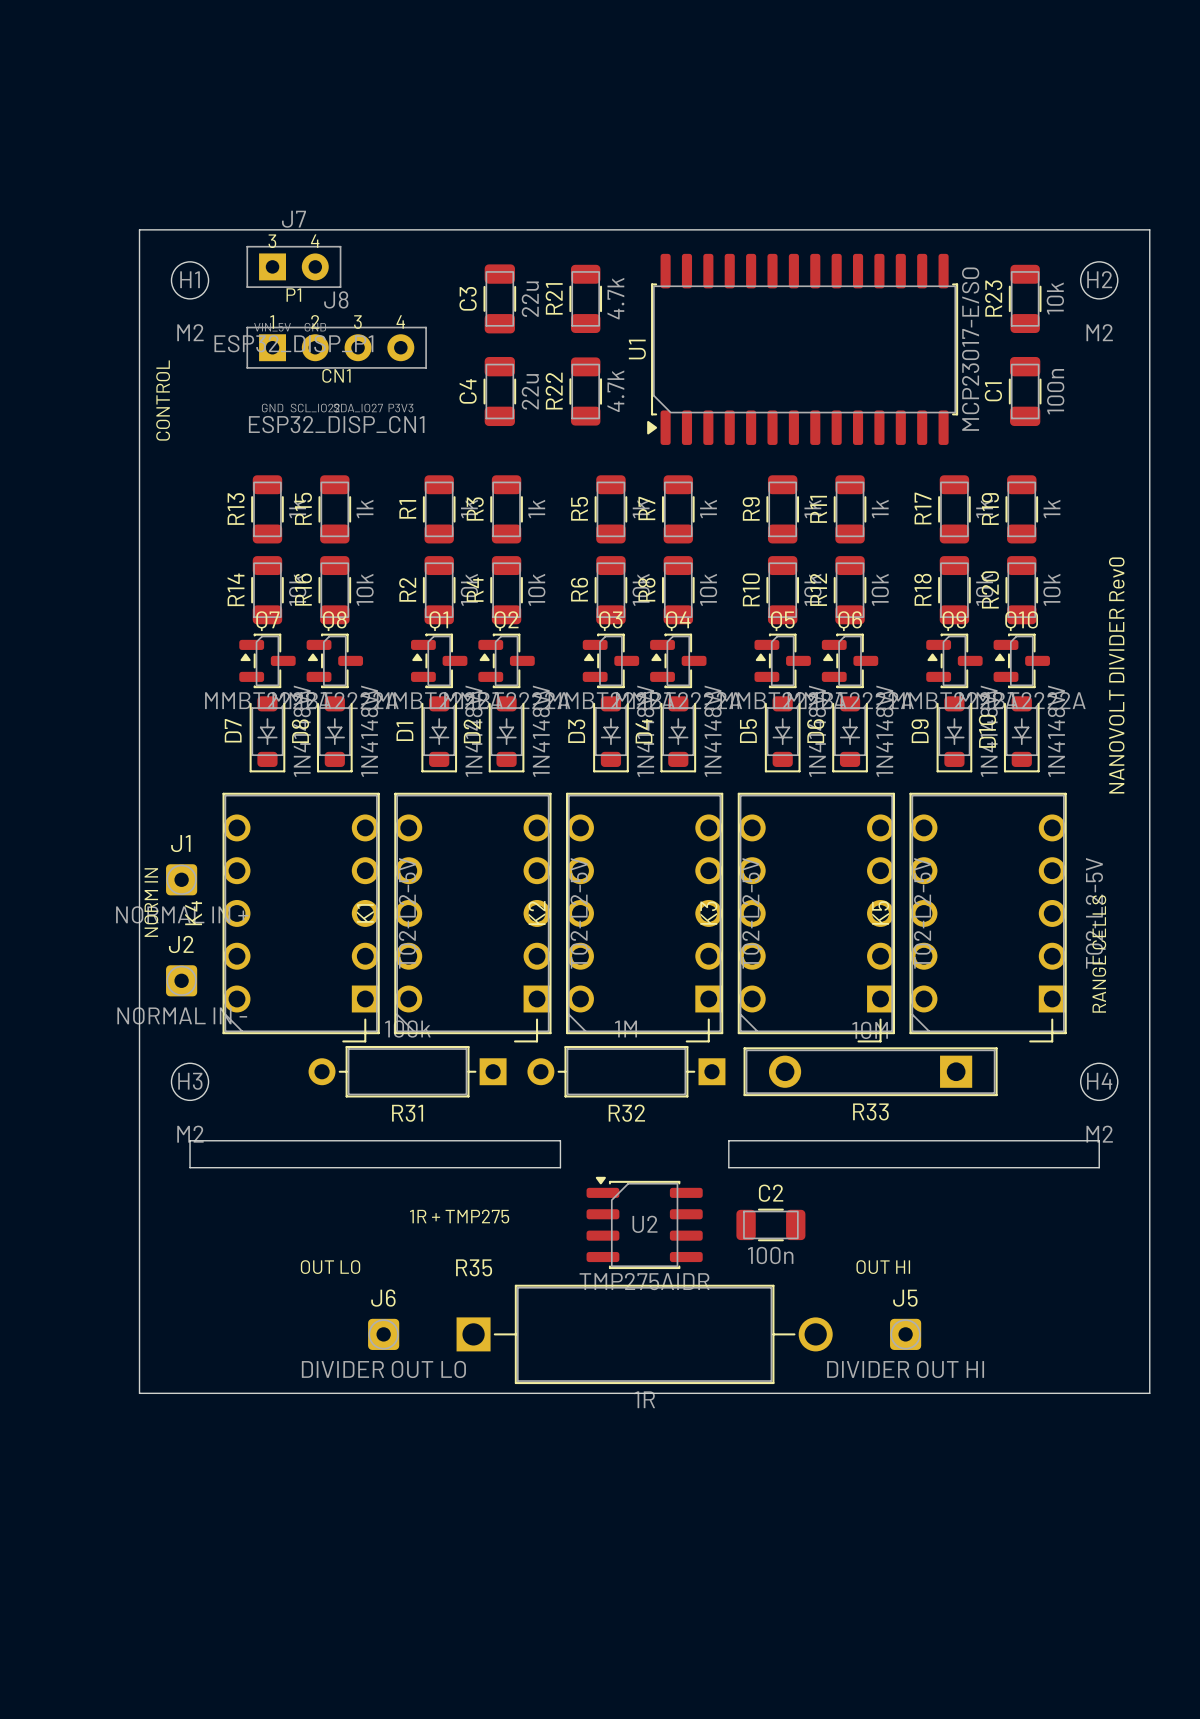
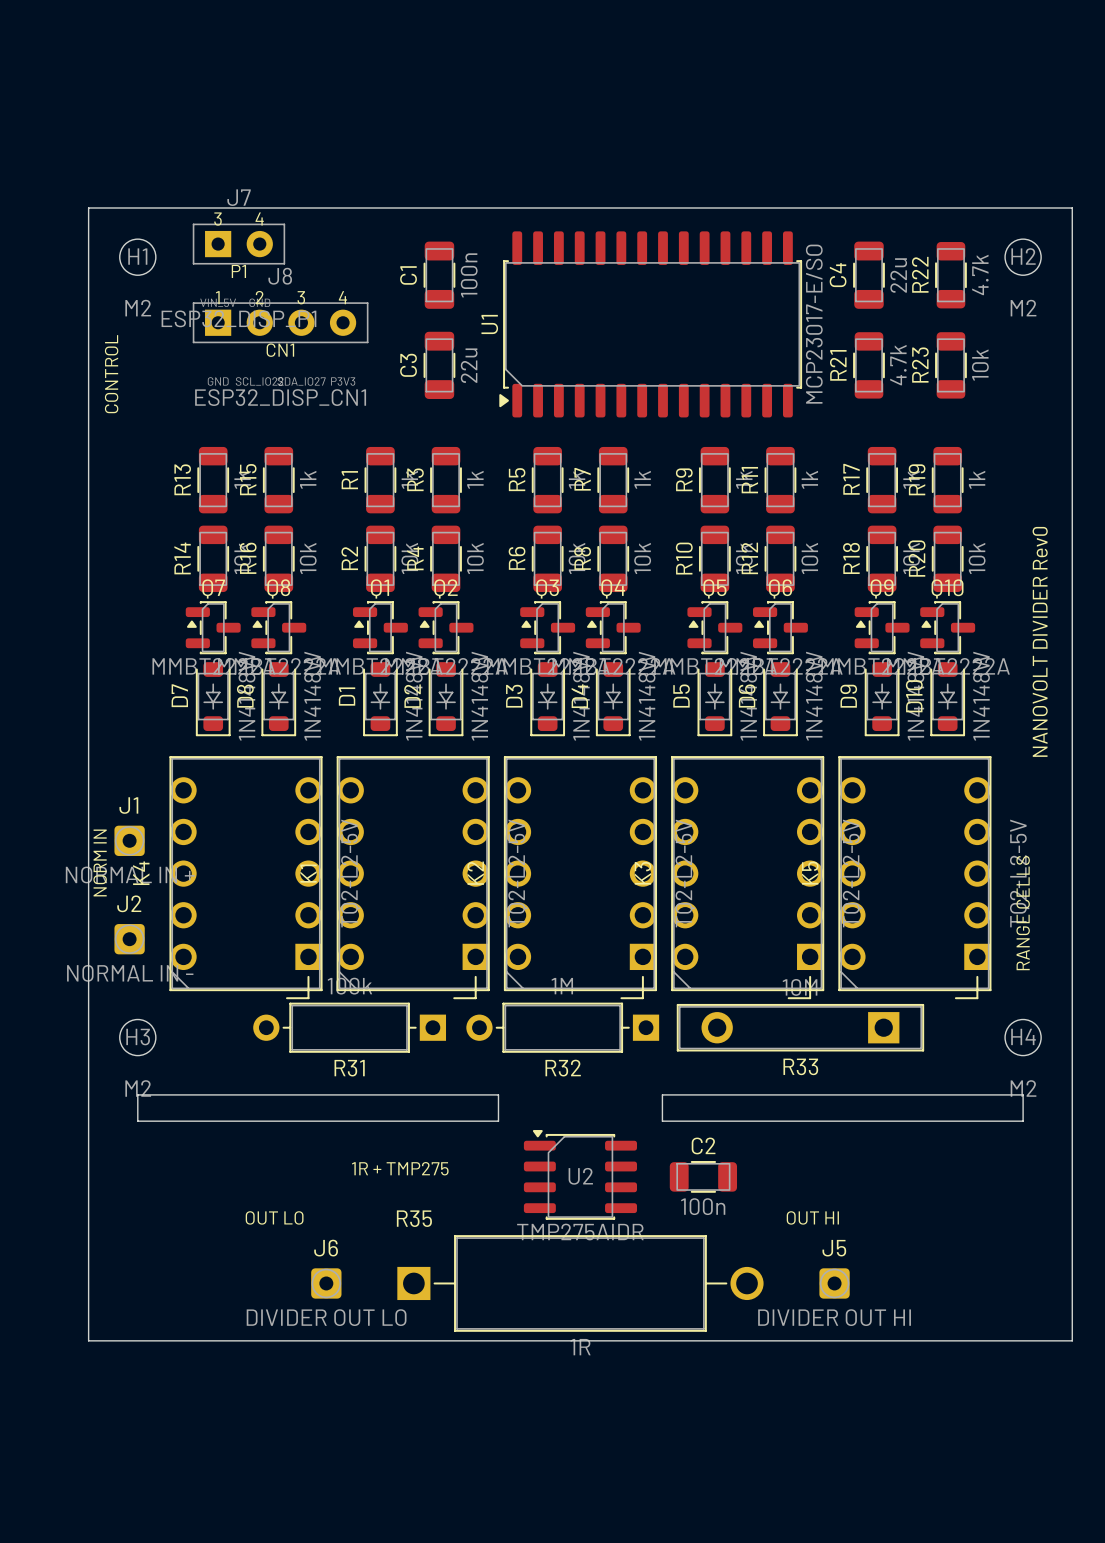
C3 name: C3 (468, 298) -> C1 (408, 275)
R21 position: (585, 298) -> (868, 365)
C4: none -> 22u (868, 275)
R23 name: R23 (993, 298) -> R22 (920, 274)
R23 value: 10k (1055, 298) -> 4.7k (980, 274)
C3 value: 22u (530, 299) -> 100n (469, 275)
U1 position: (802, 349) -> (650, 324)
C4 name: C4 (468, 391) -> C3 (408, 365)
R22: 4.7k (585, 391) -> none
C1: 100n (1025, 391) -> none
R23: none -> 10k (950, 365)

